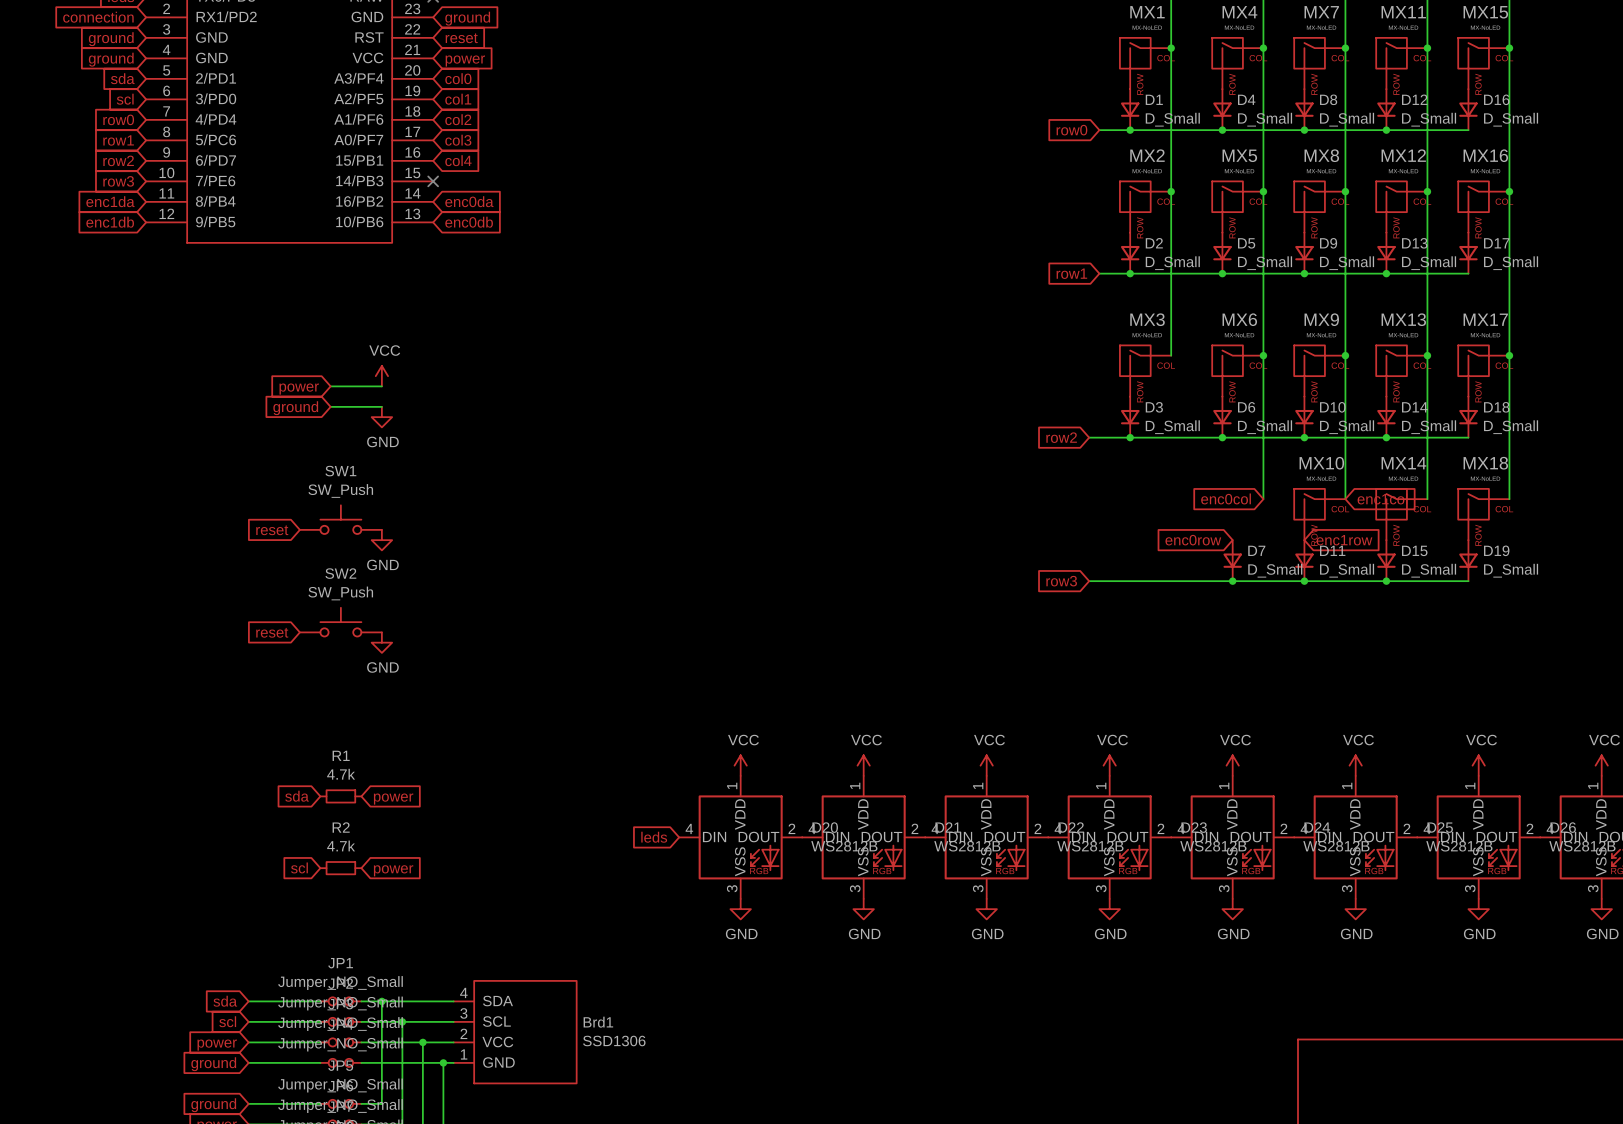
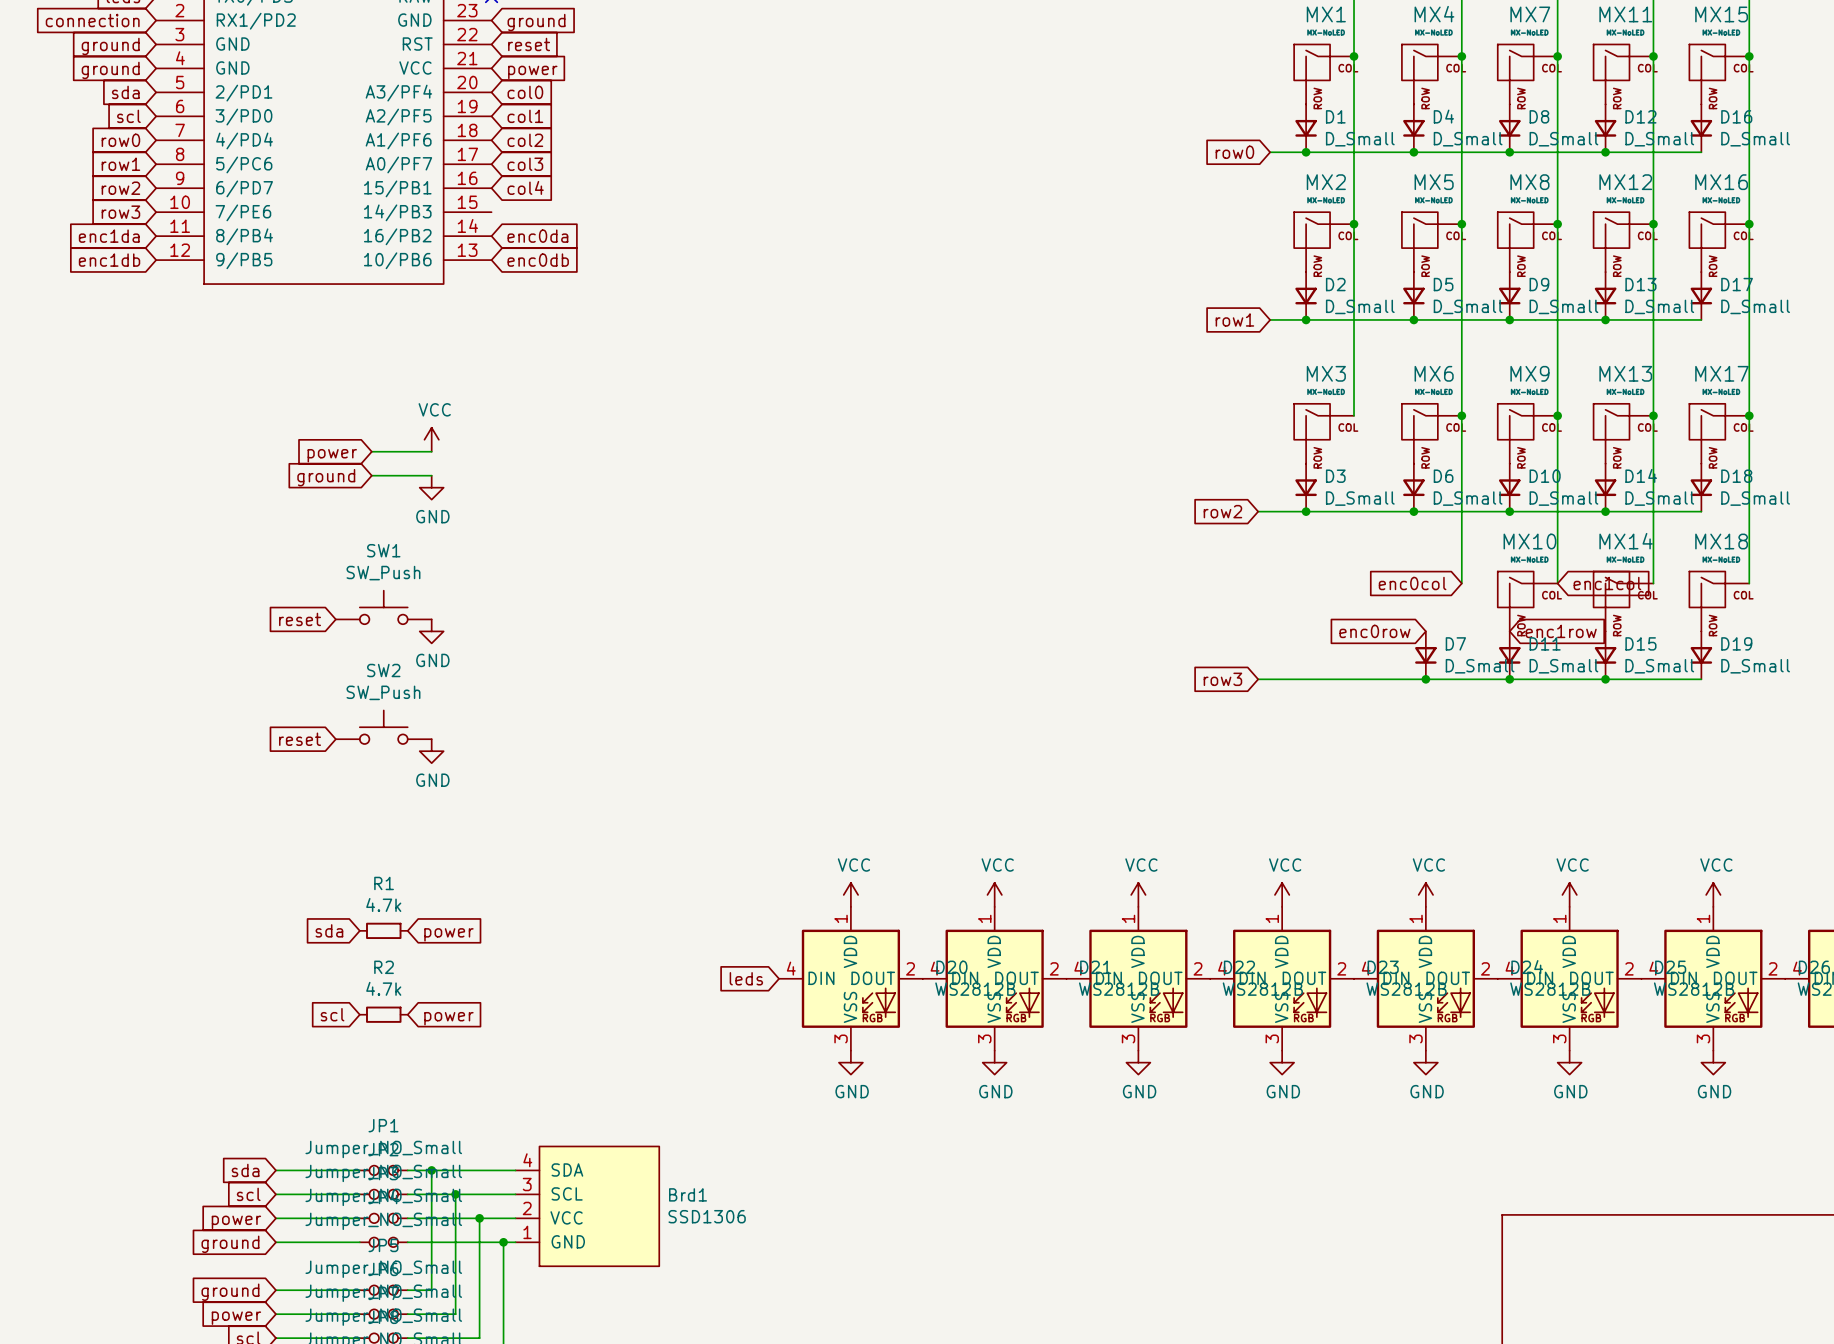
no-connect mark: (433, 181) -> none

